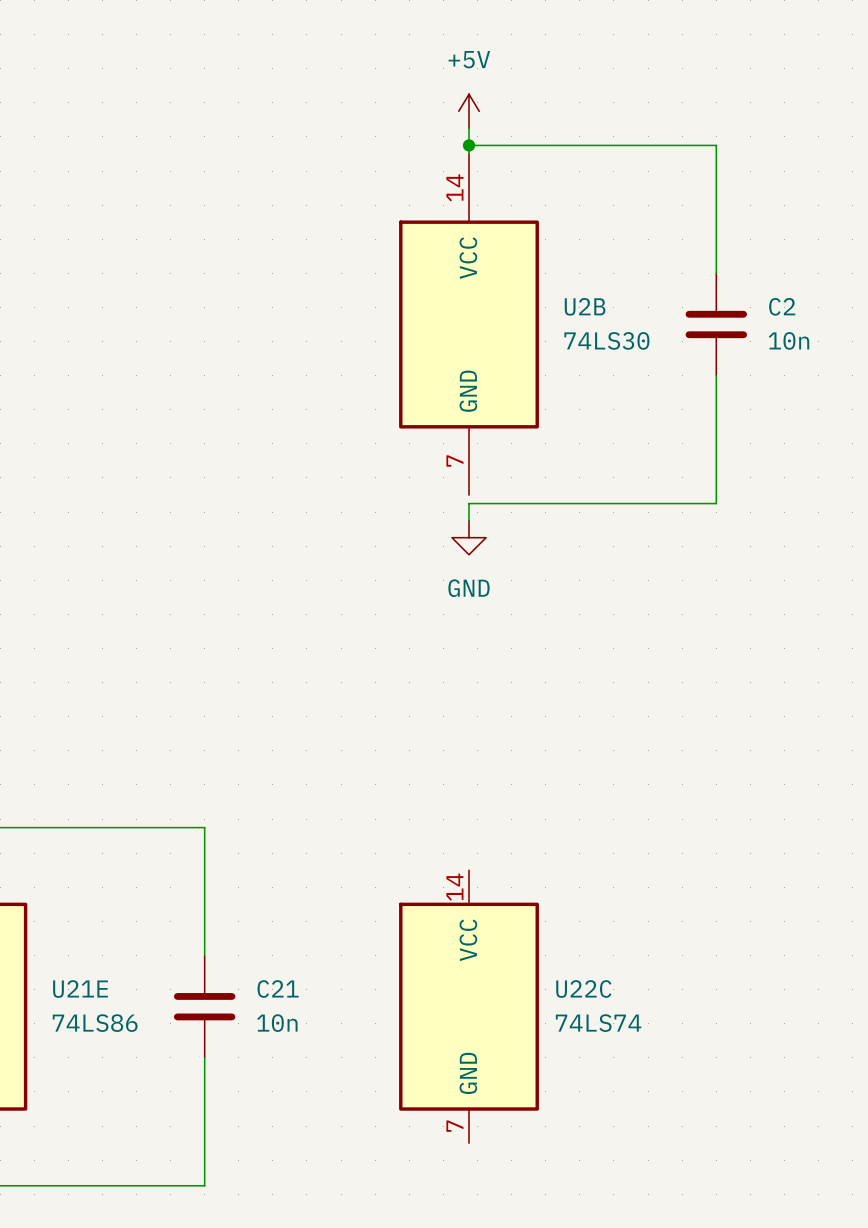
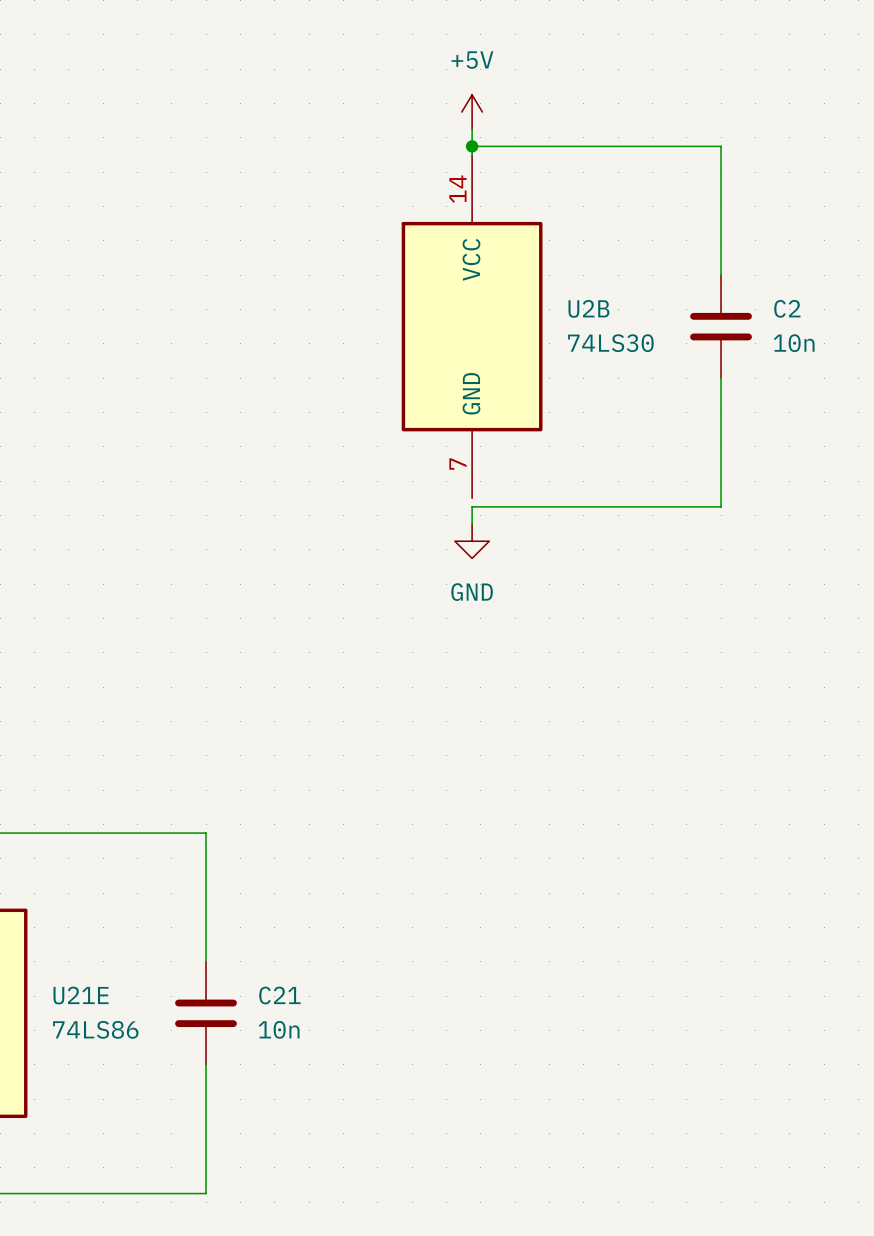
U22C: 74LS74 (469, 1006) -> none

